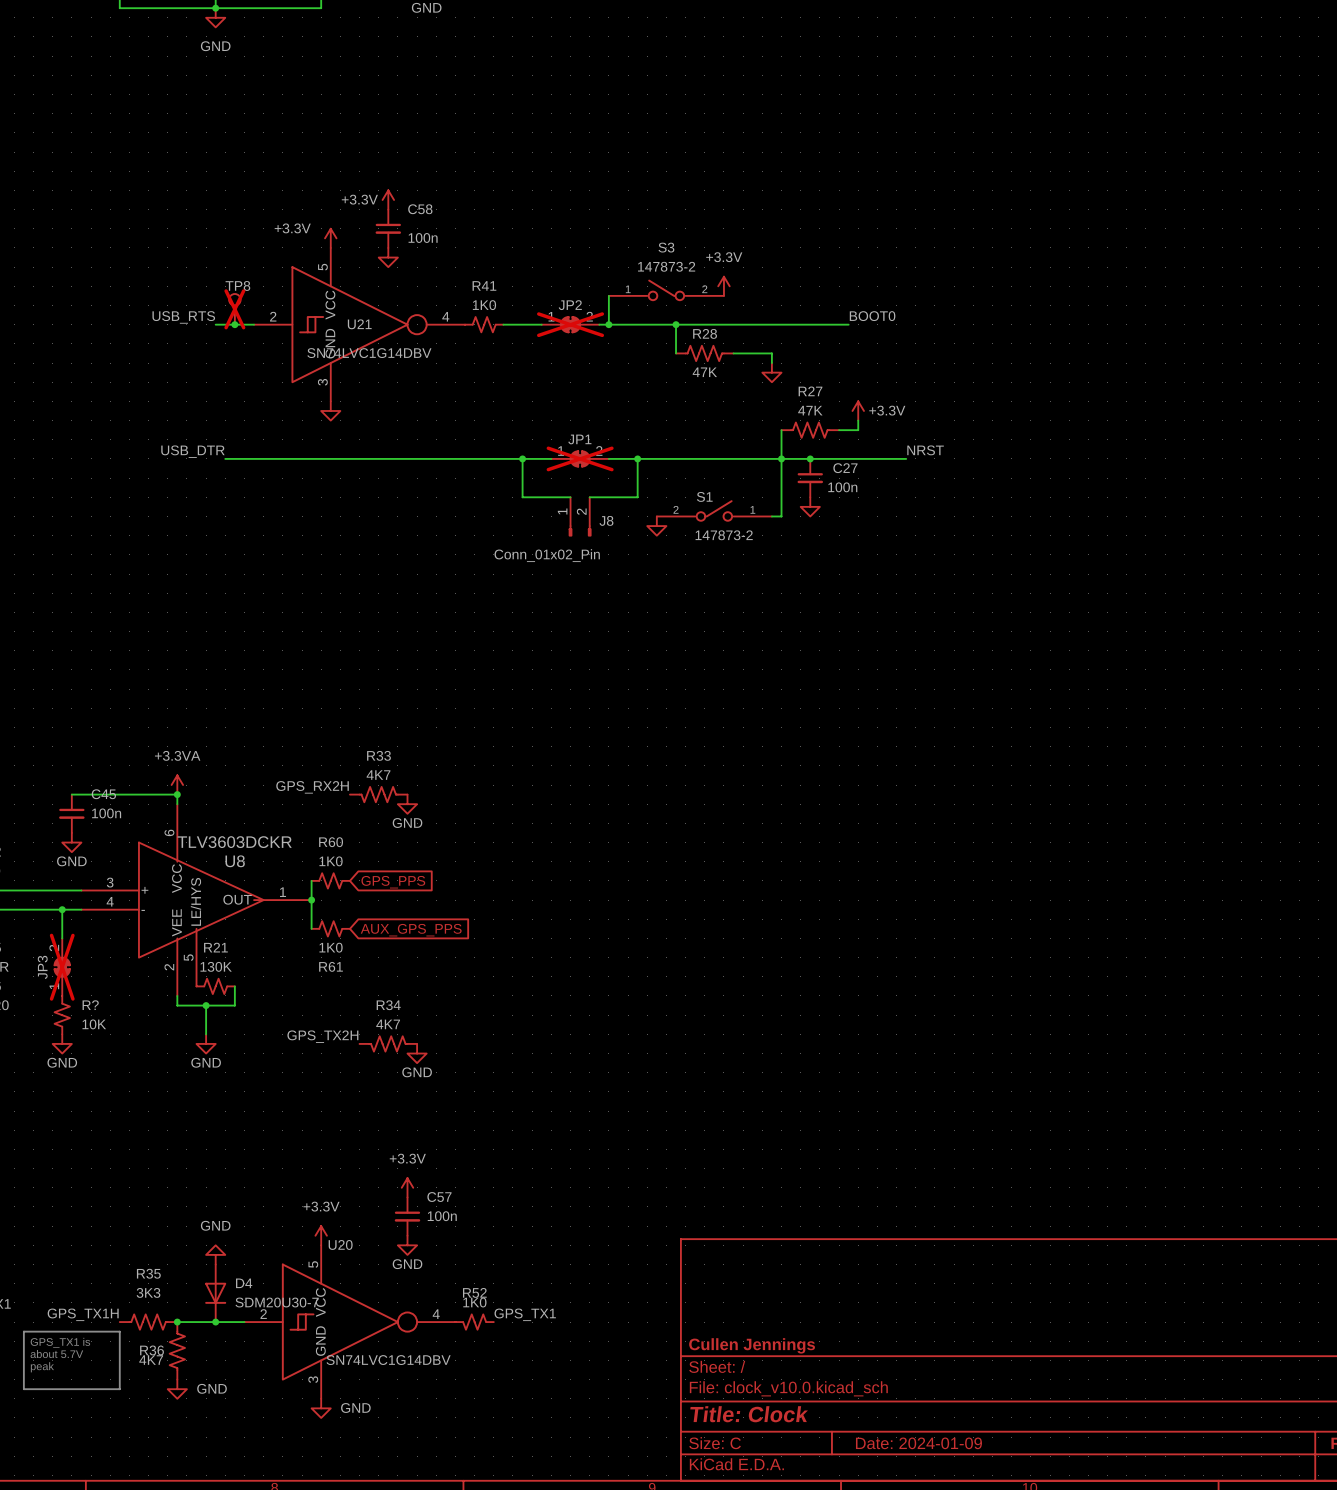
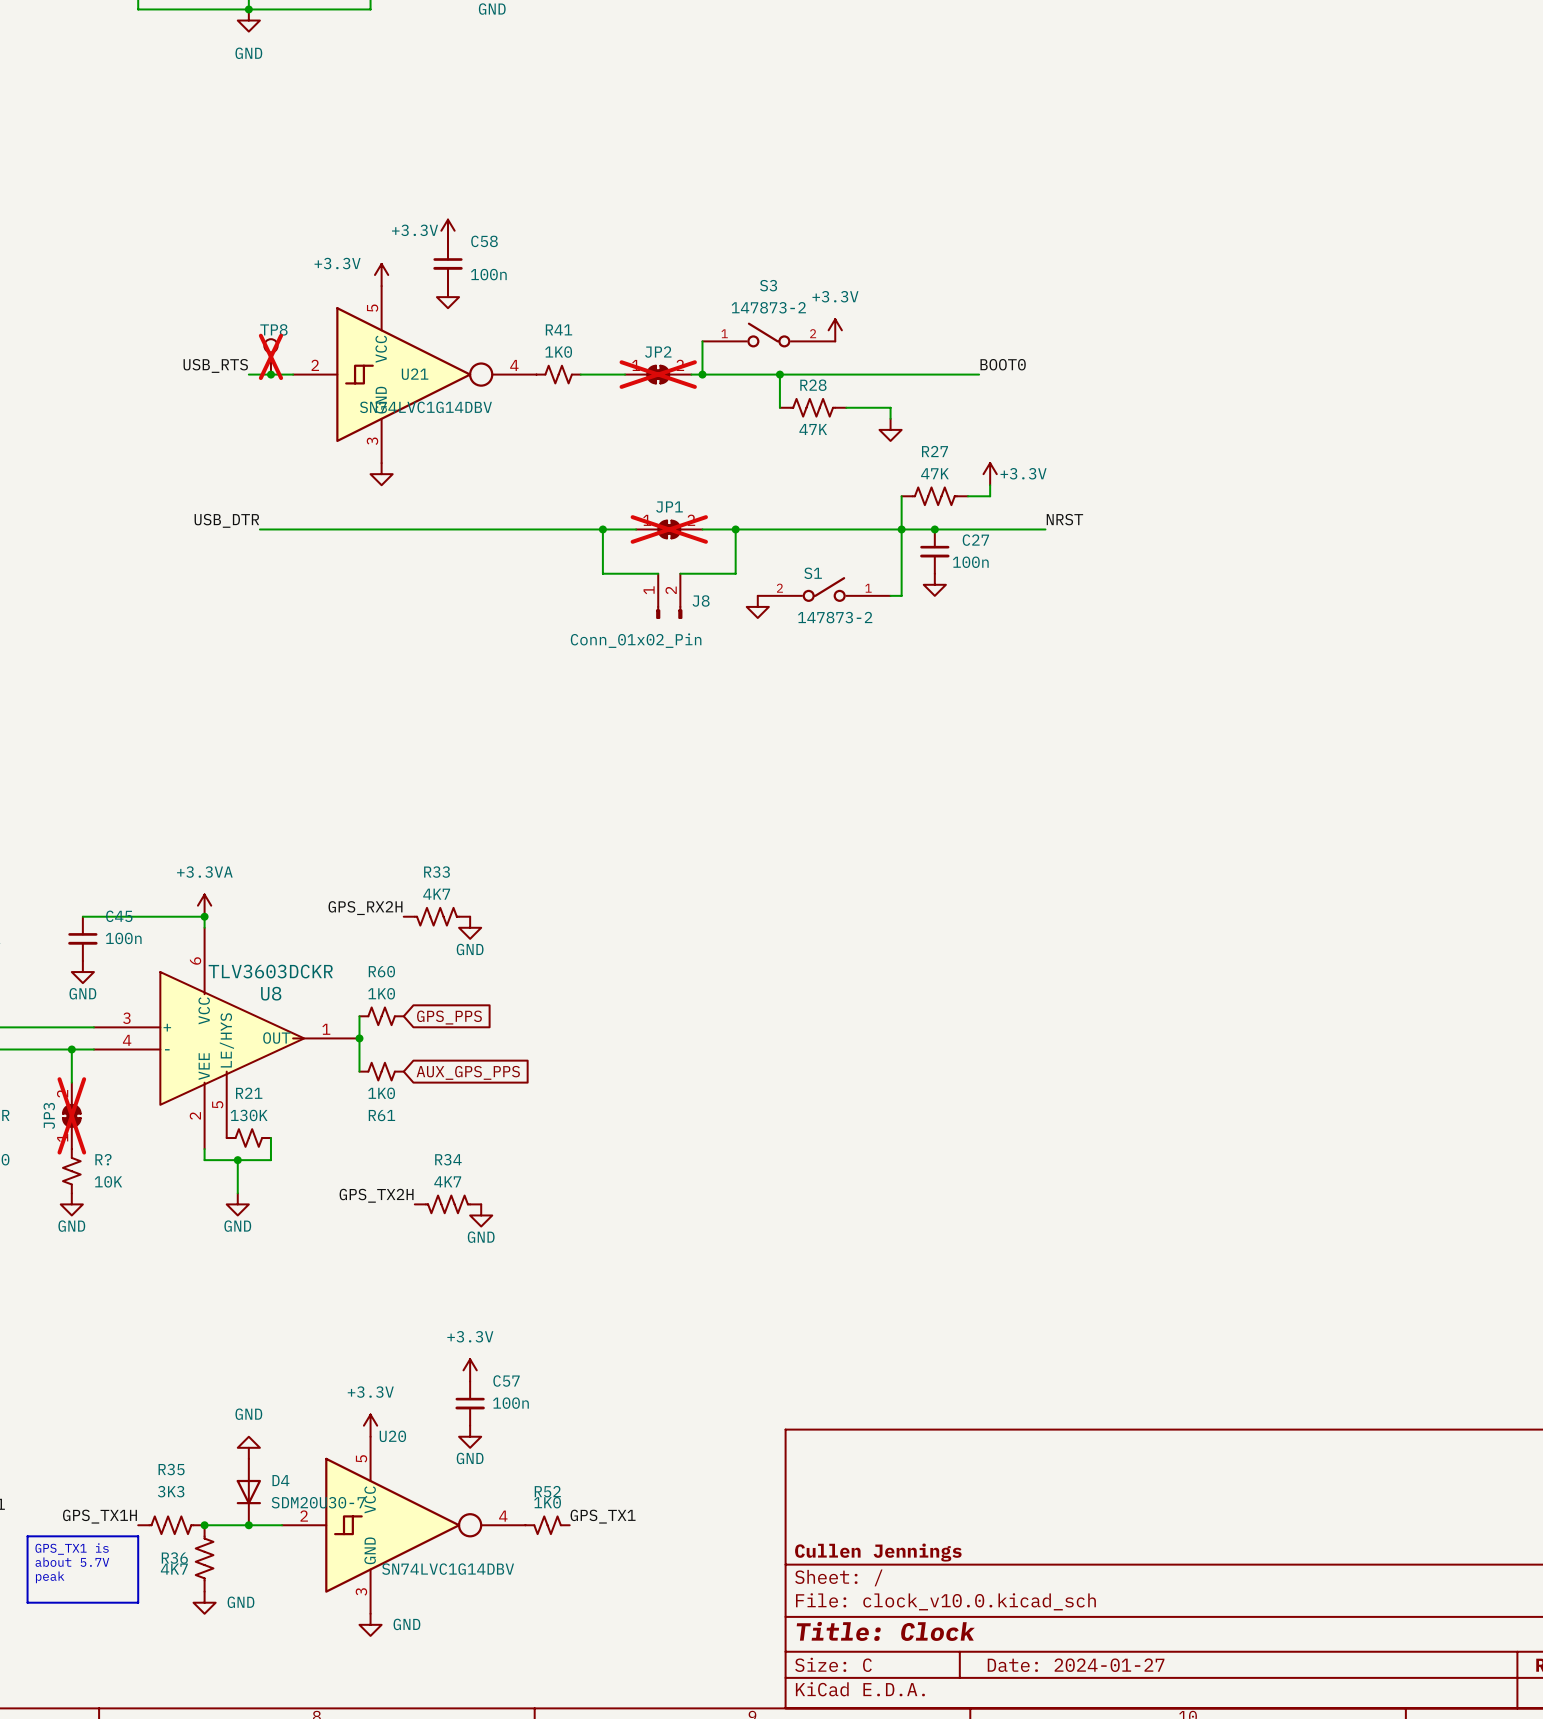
title block: Date: 2024-01-09 (918, 1443) -> Date: 2024-01-27 (1076, 1665)

